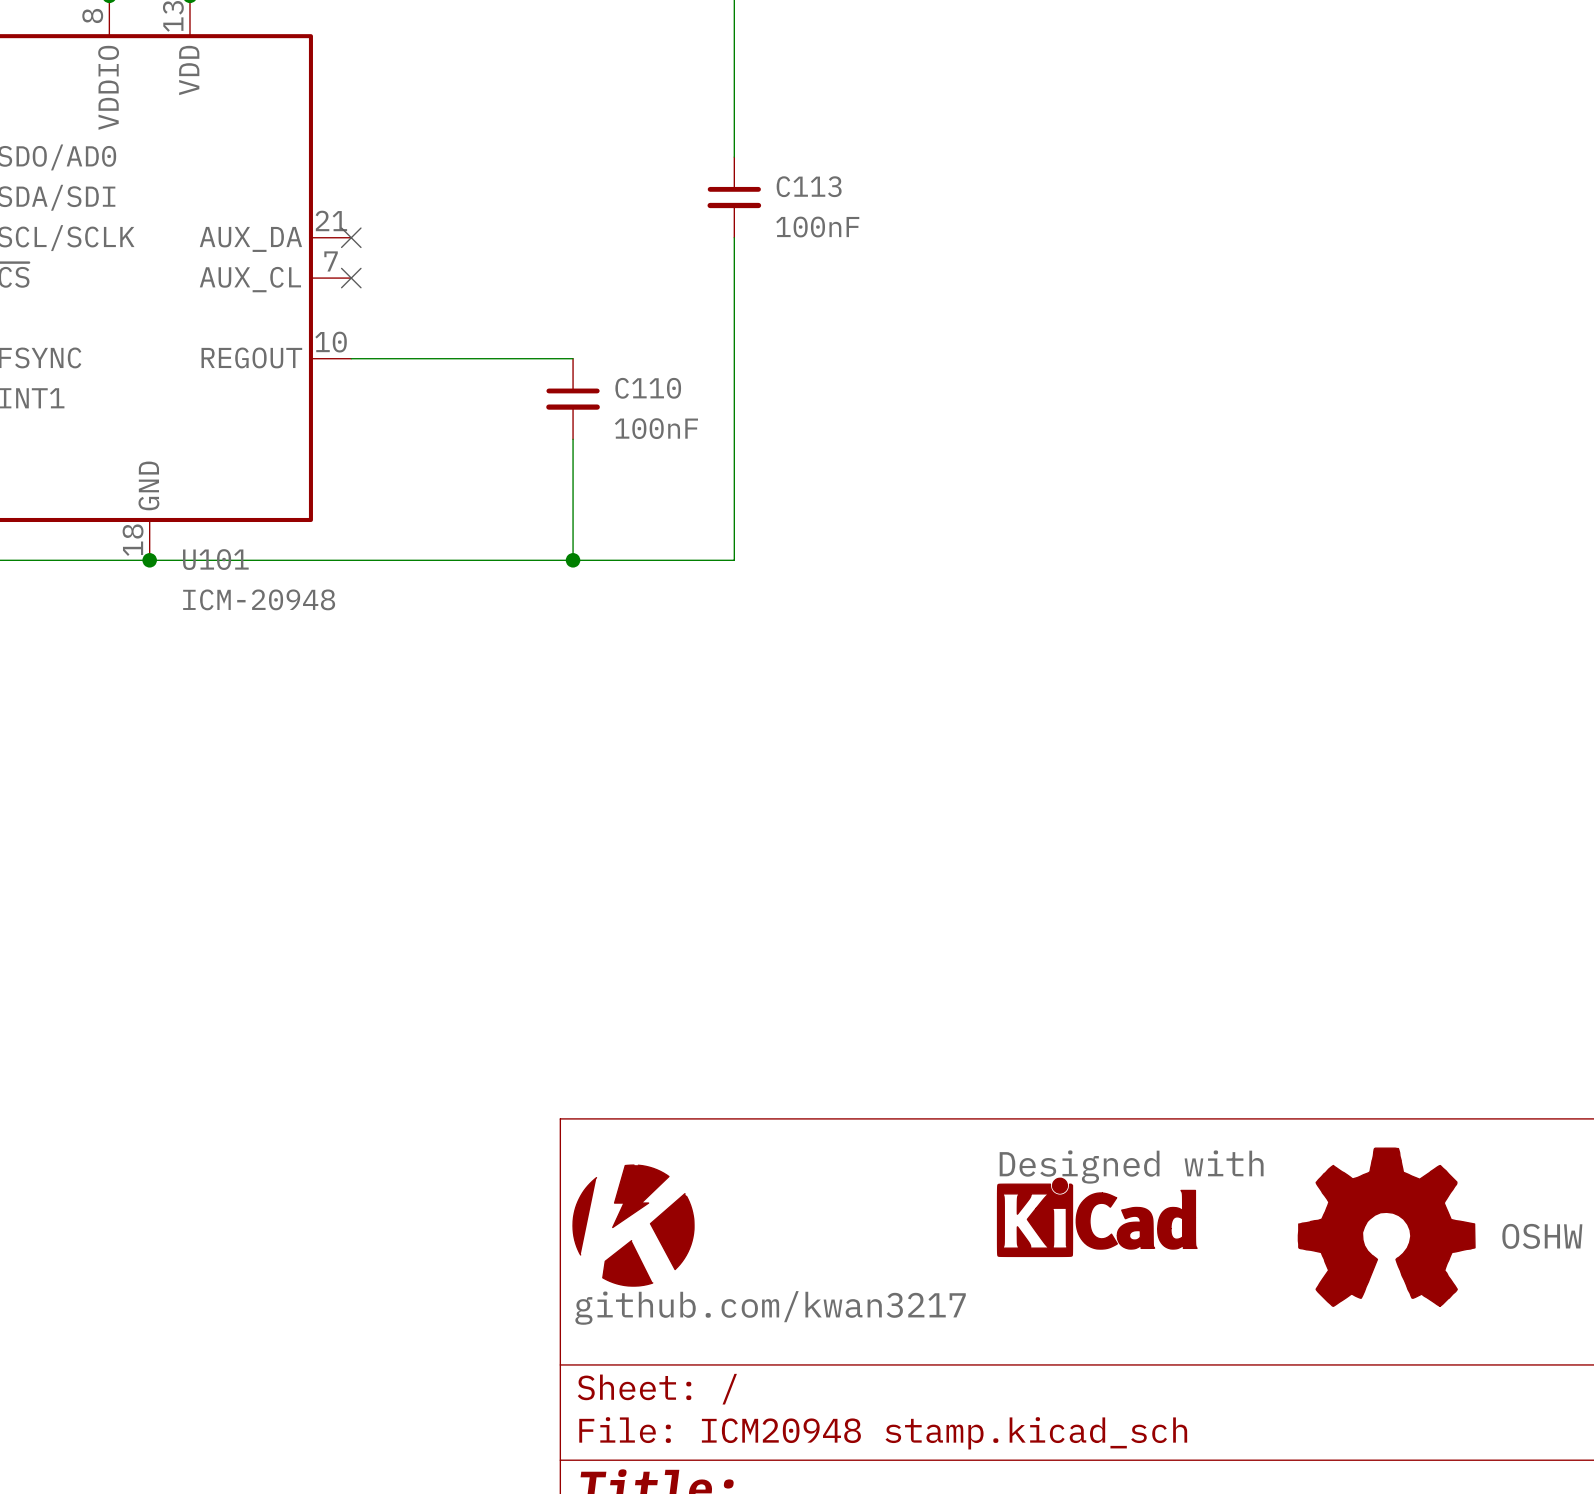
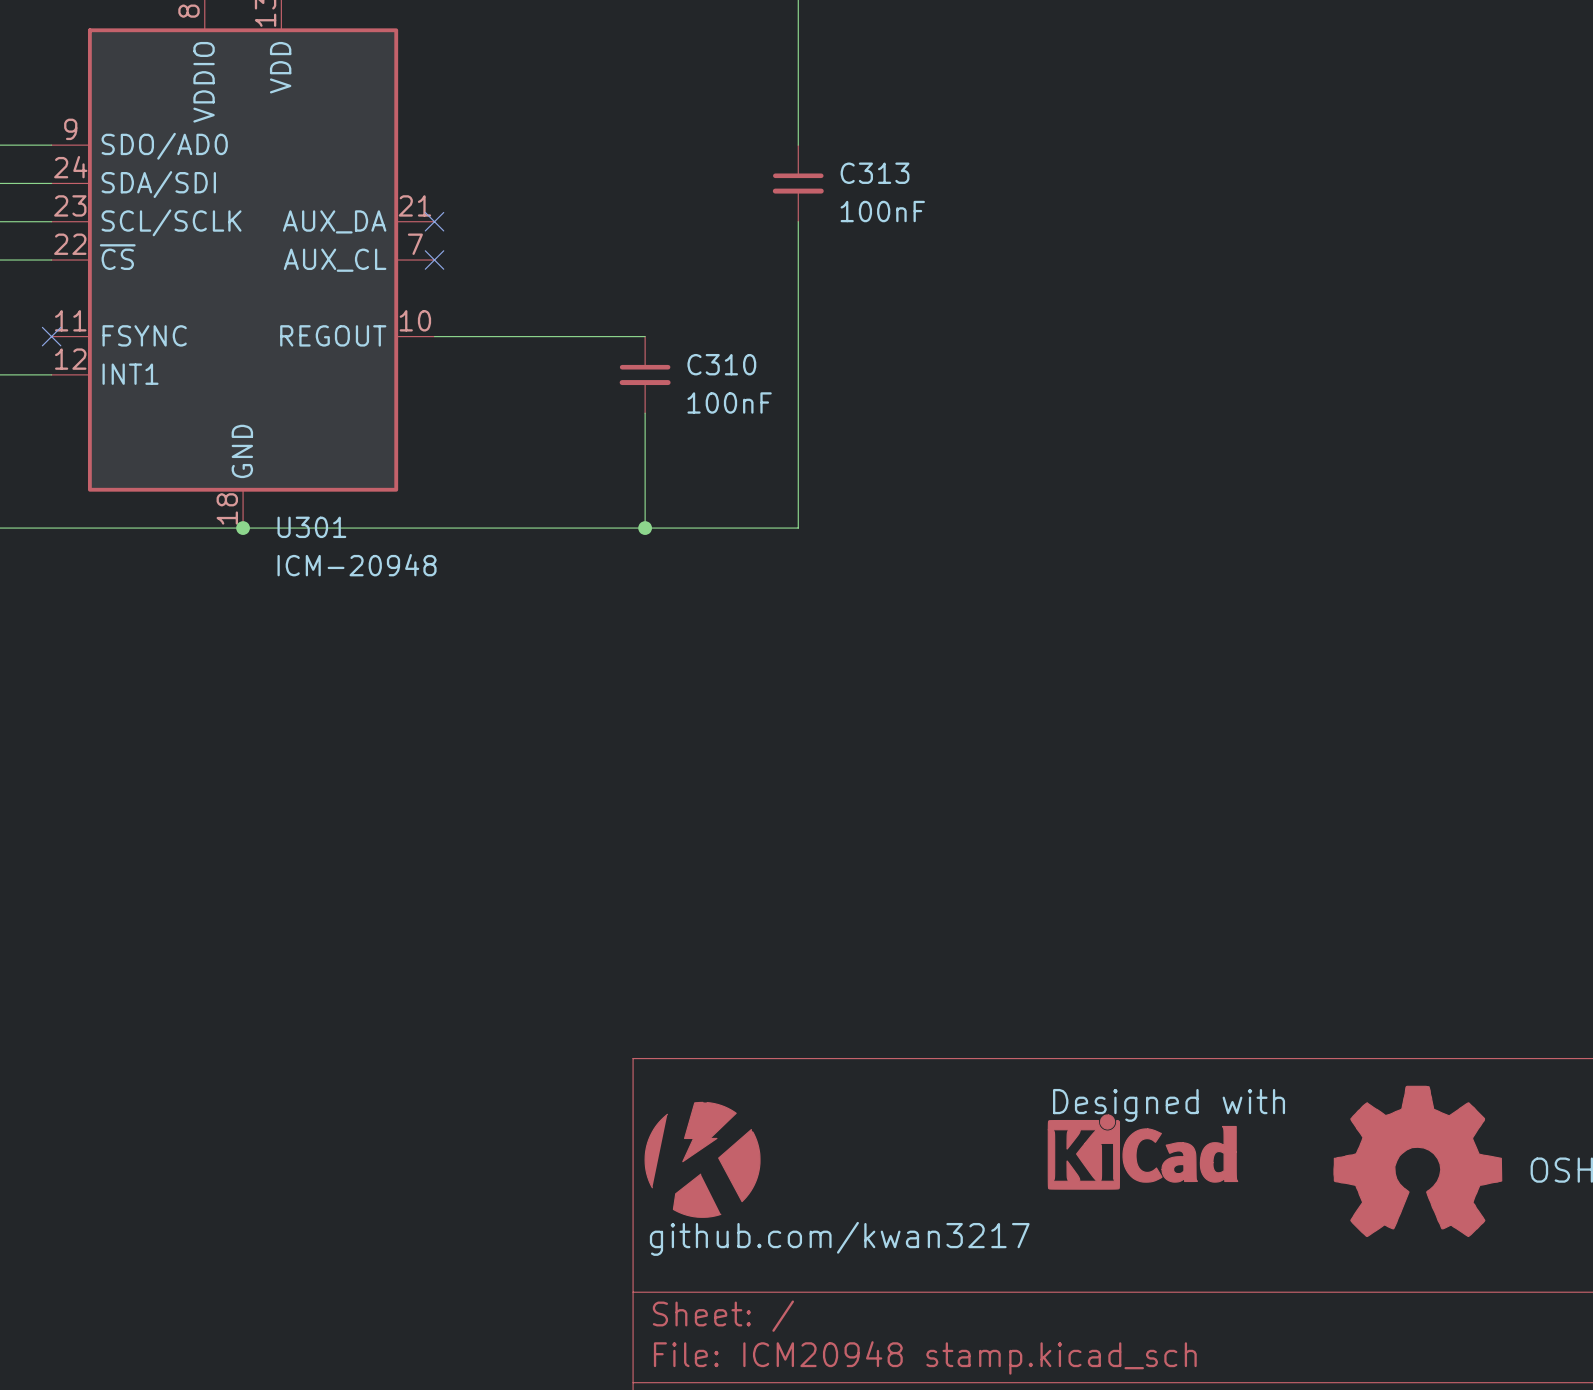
C113 name: C113 (809, 186) -> C313 (875, 173)
C110 name: C110 (648, 388) -> C310 (721, 364)
U101 name: U101 (215, 559) -> U301 (311, 527)

